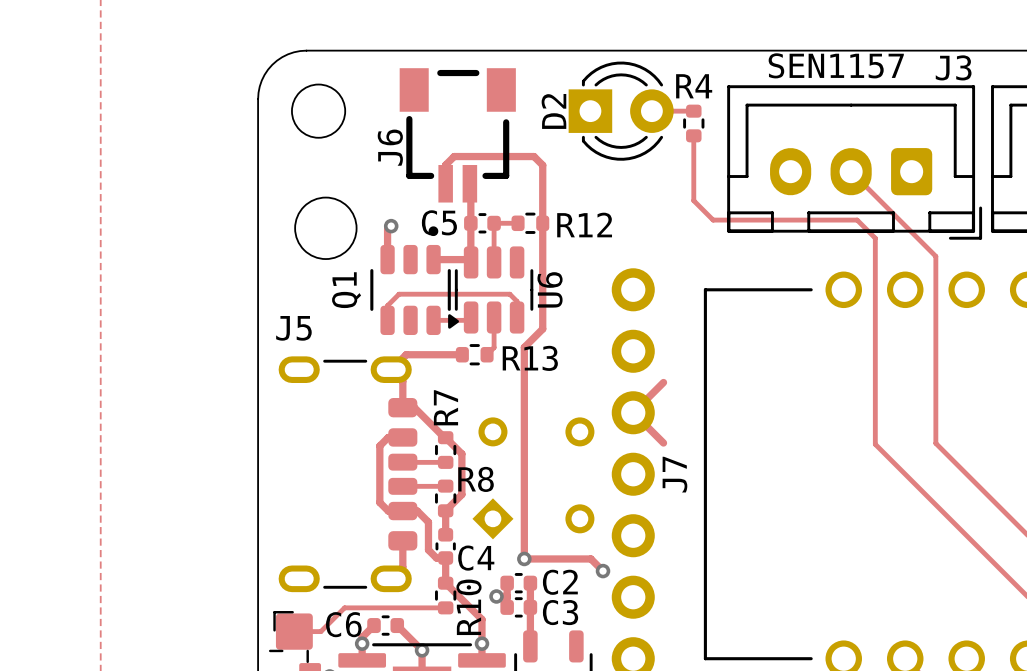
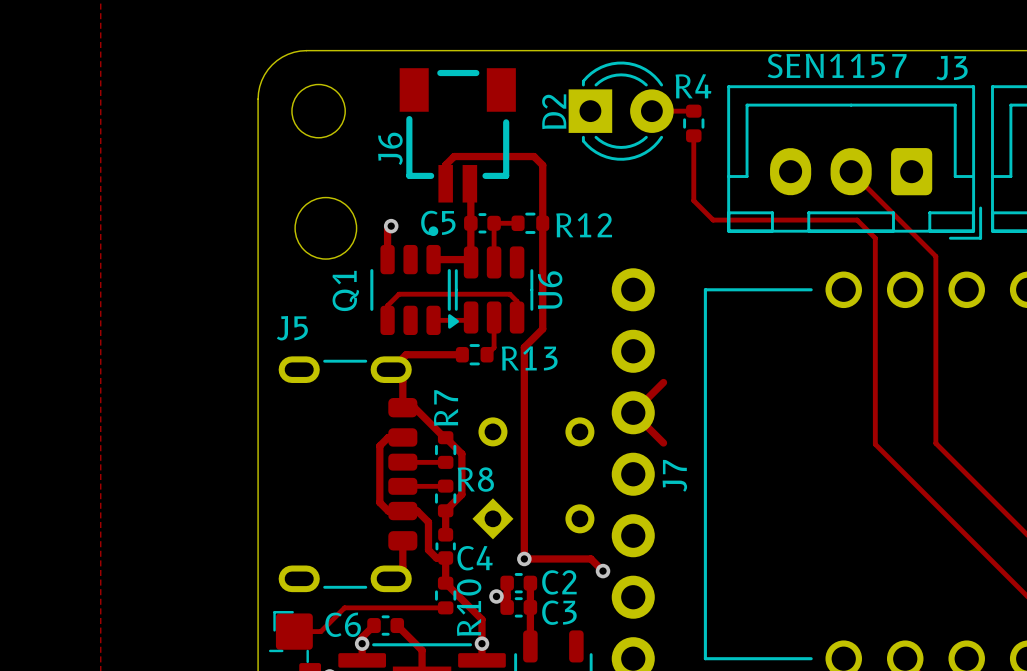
via: (422, 650) -> none

